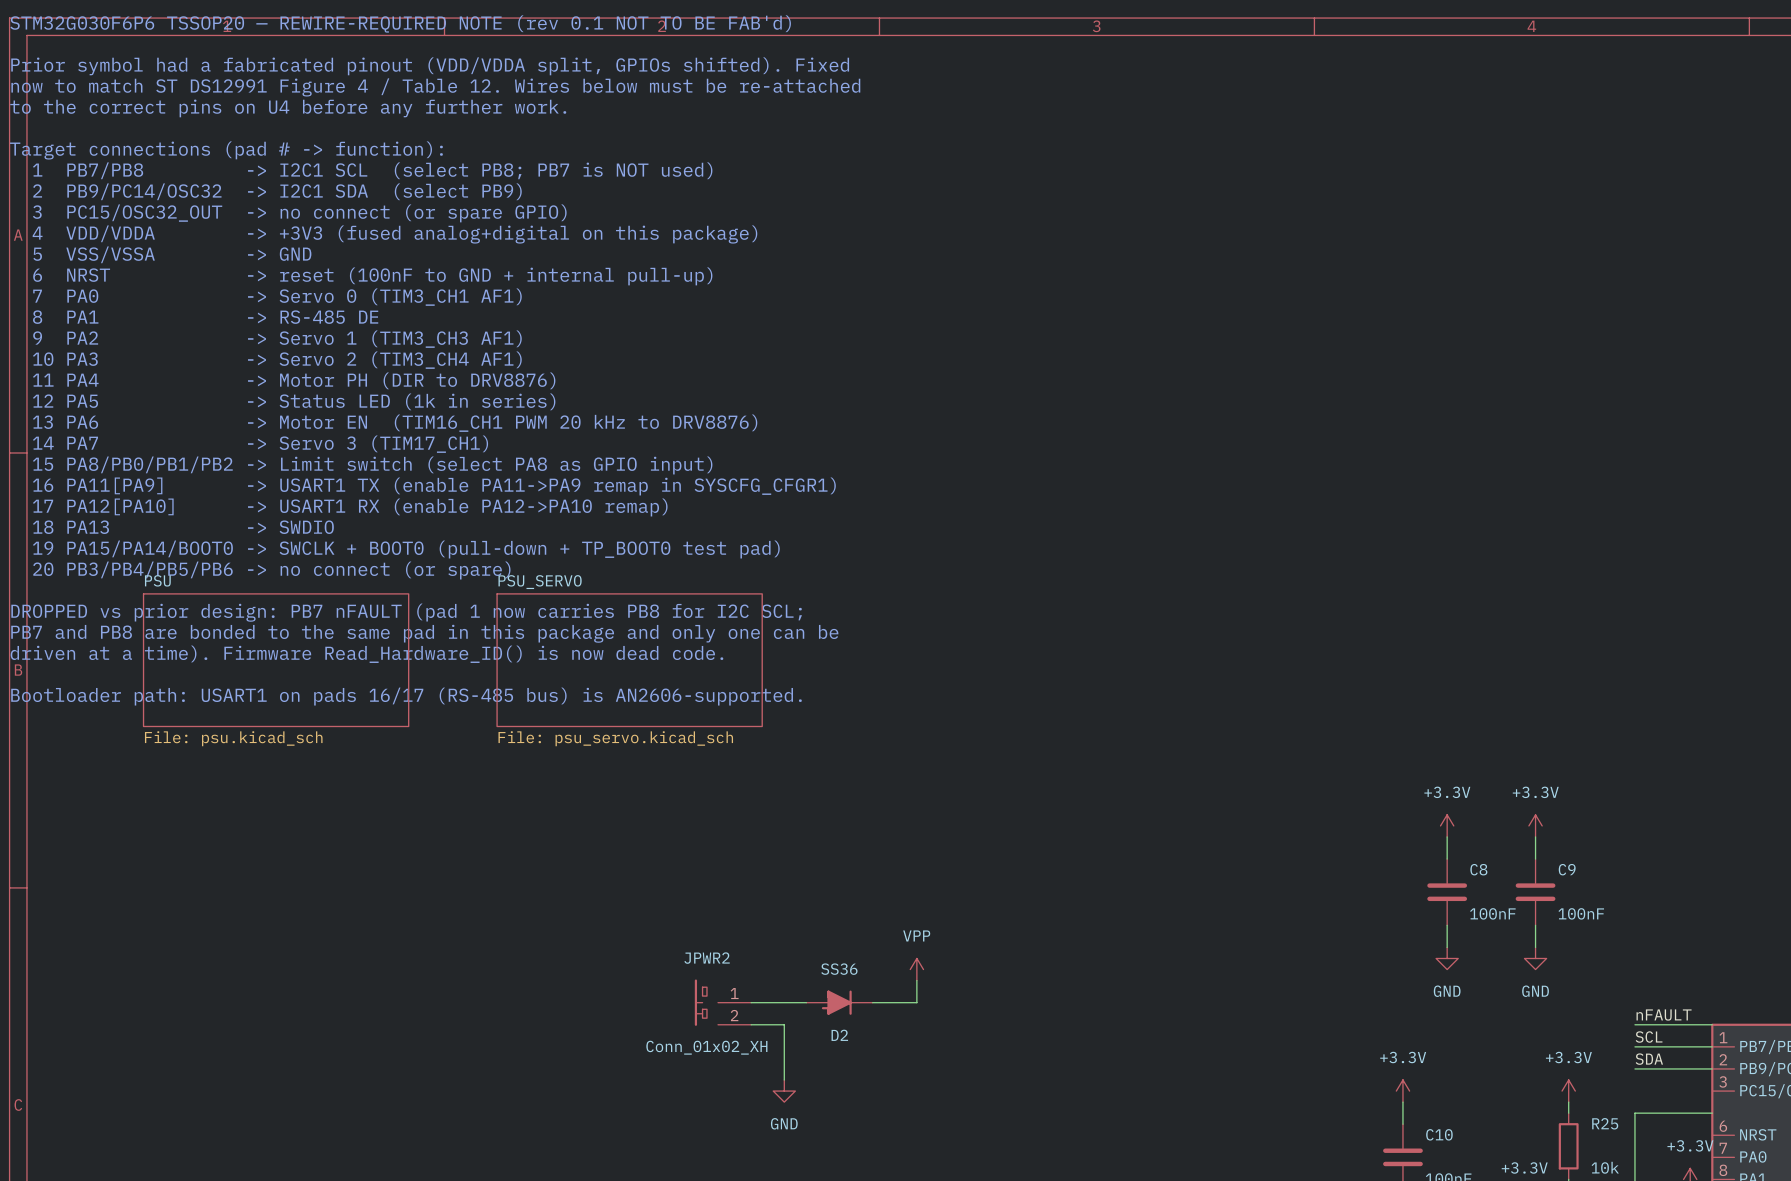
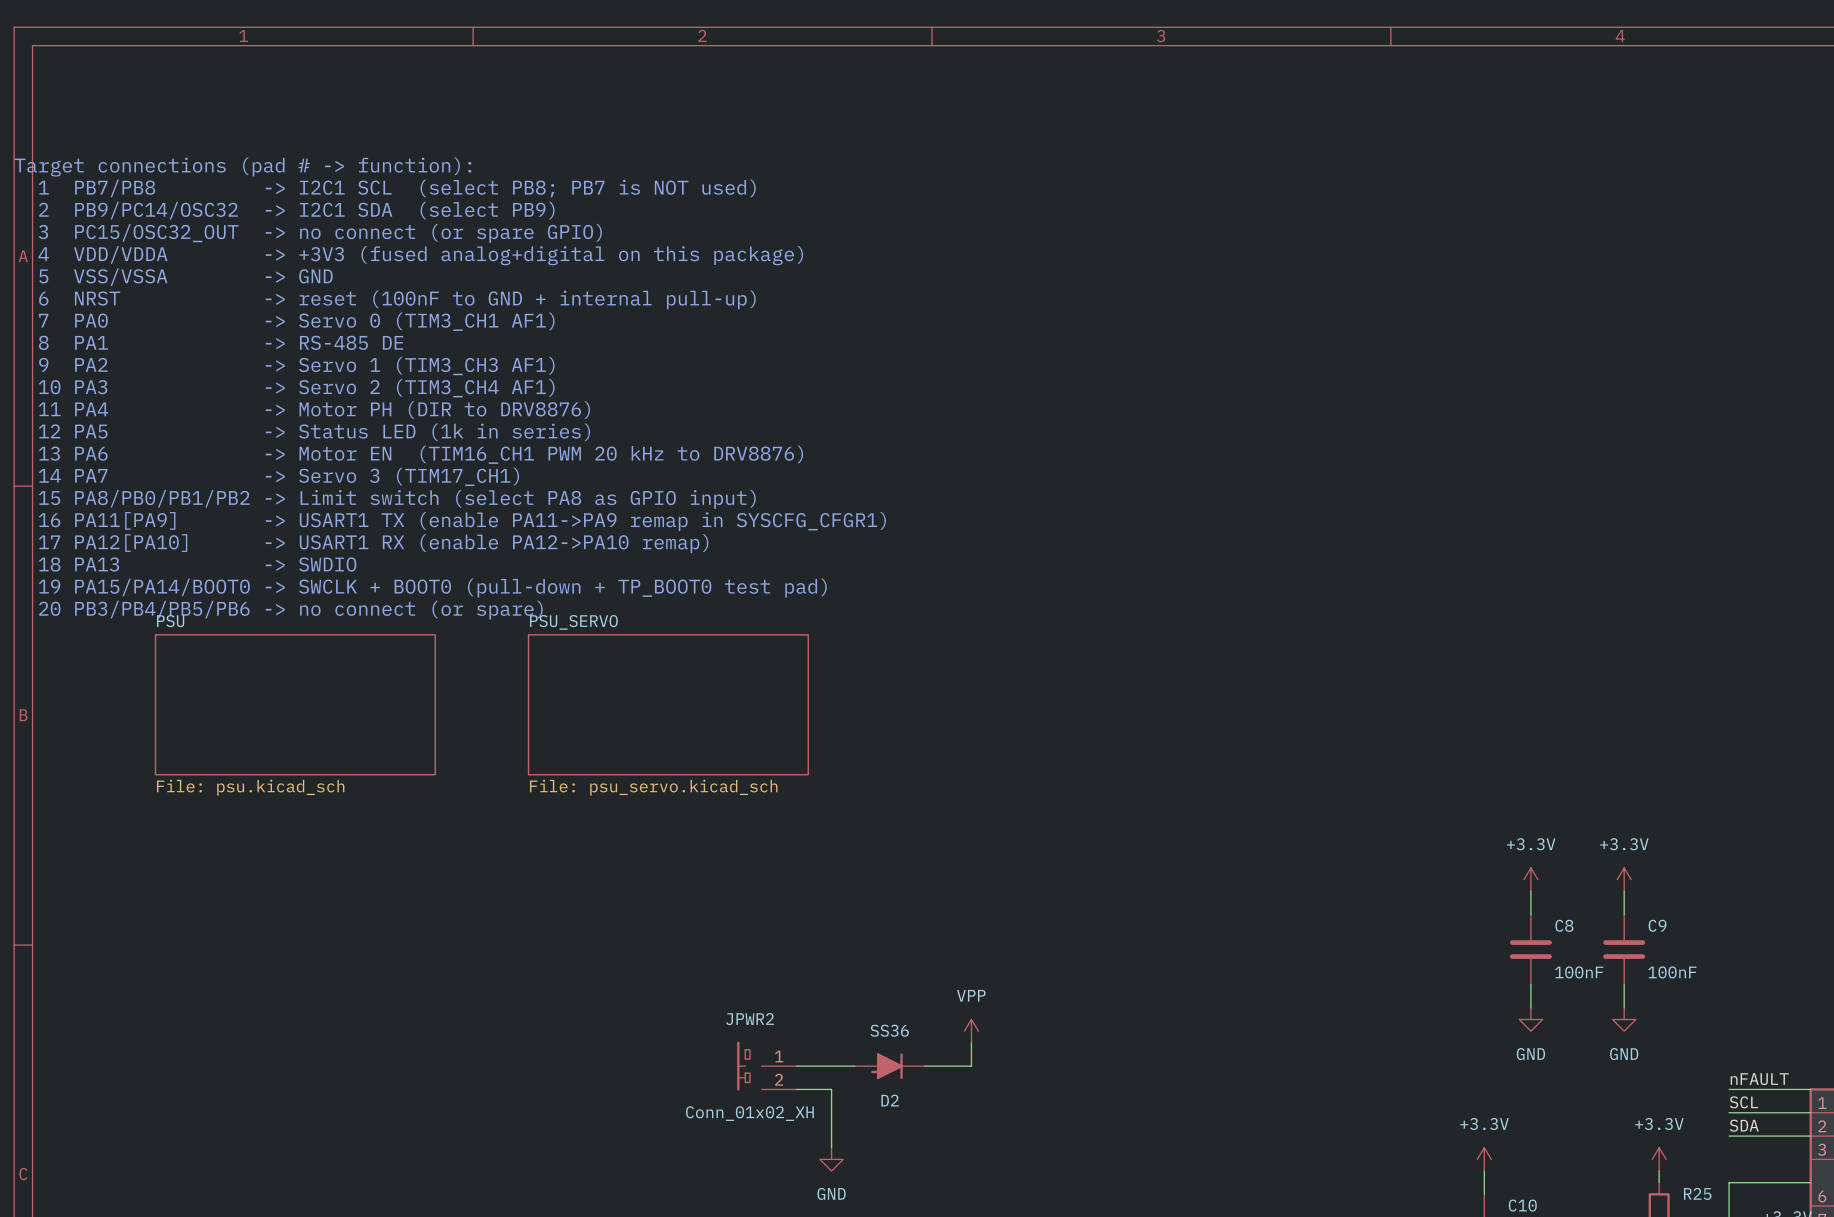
text: STM32G030F6P6 TSSOP20 — REWIRE-REQUIRED NOTE (rev 0.1 NOT TO BE FAB'd) (400, 23) -> none
text: Prior symbol had a fabricated pinout (VDD/VDDA split, GPIOs shifted). Fixed (430, 66) -> none
text: now to match ST DS12991 Figure 4 / Table 12. Wires below must be re-attached (435, 87) -> none
text: to the correct pins on U4 before any further work. (288, 108) -> none
text: DROPPED vs prior design: PB7 nFAULT (pad 1 now carries PB8 for I2C SCL; (406, 612) -> none
text: PB7 and PB8 are bonded to the same pad in this package and only one can be (424, 633) -> none
text: driven at a time). Firmware Read_Hardware_ID() is now dead code. (366, 654) -> none
text: Bootloader path: USART1 on pads 16/17 (RS-485 bus) is AN2606-supported. (406, 696) -> none

